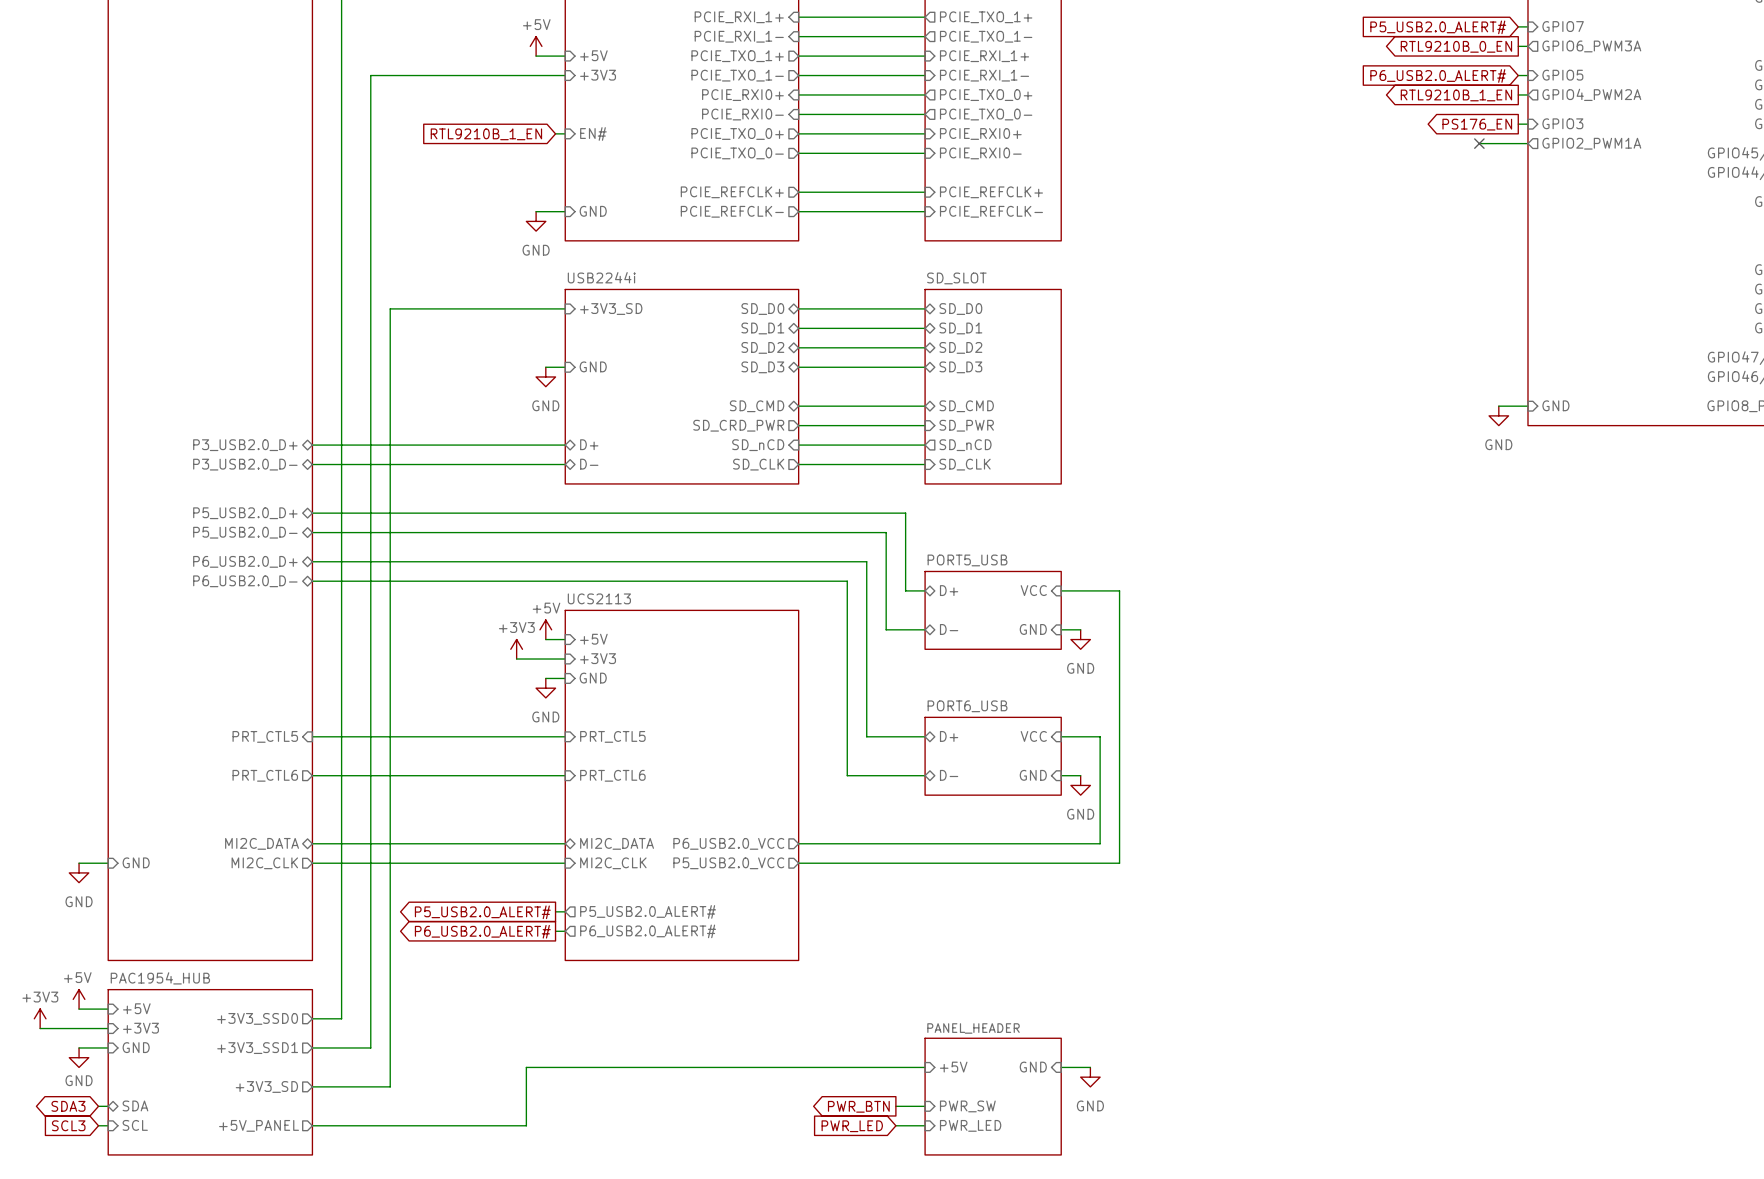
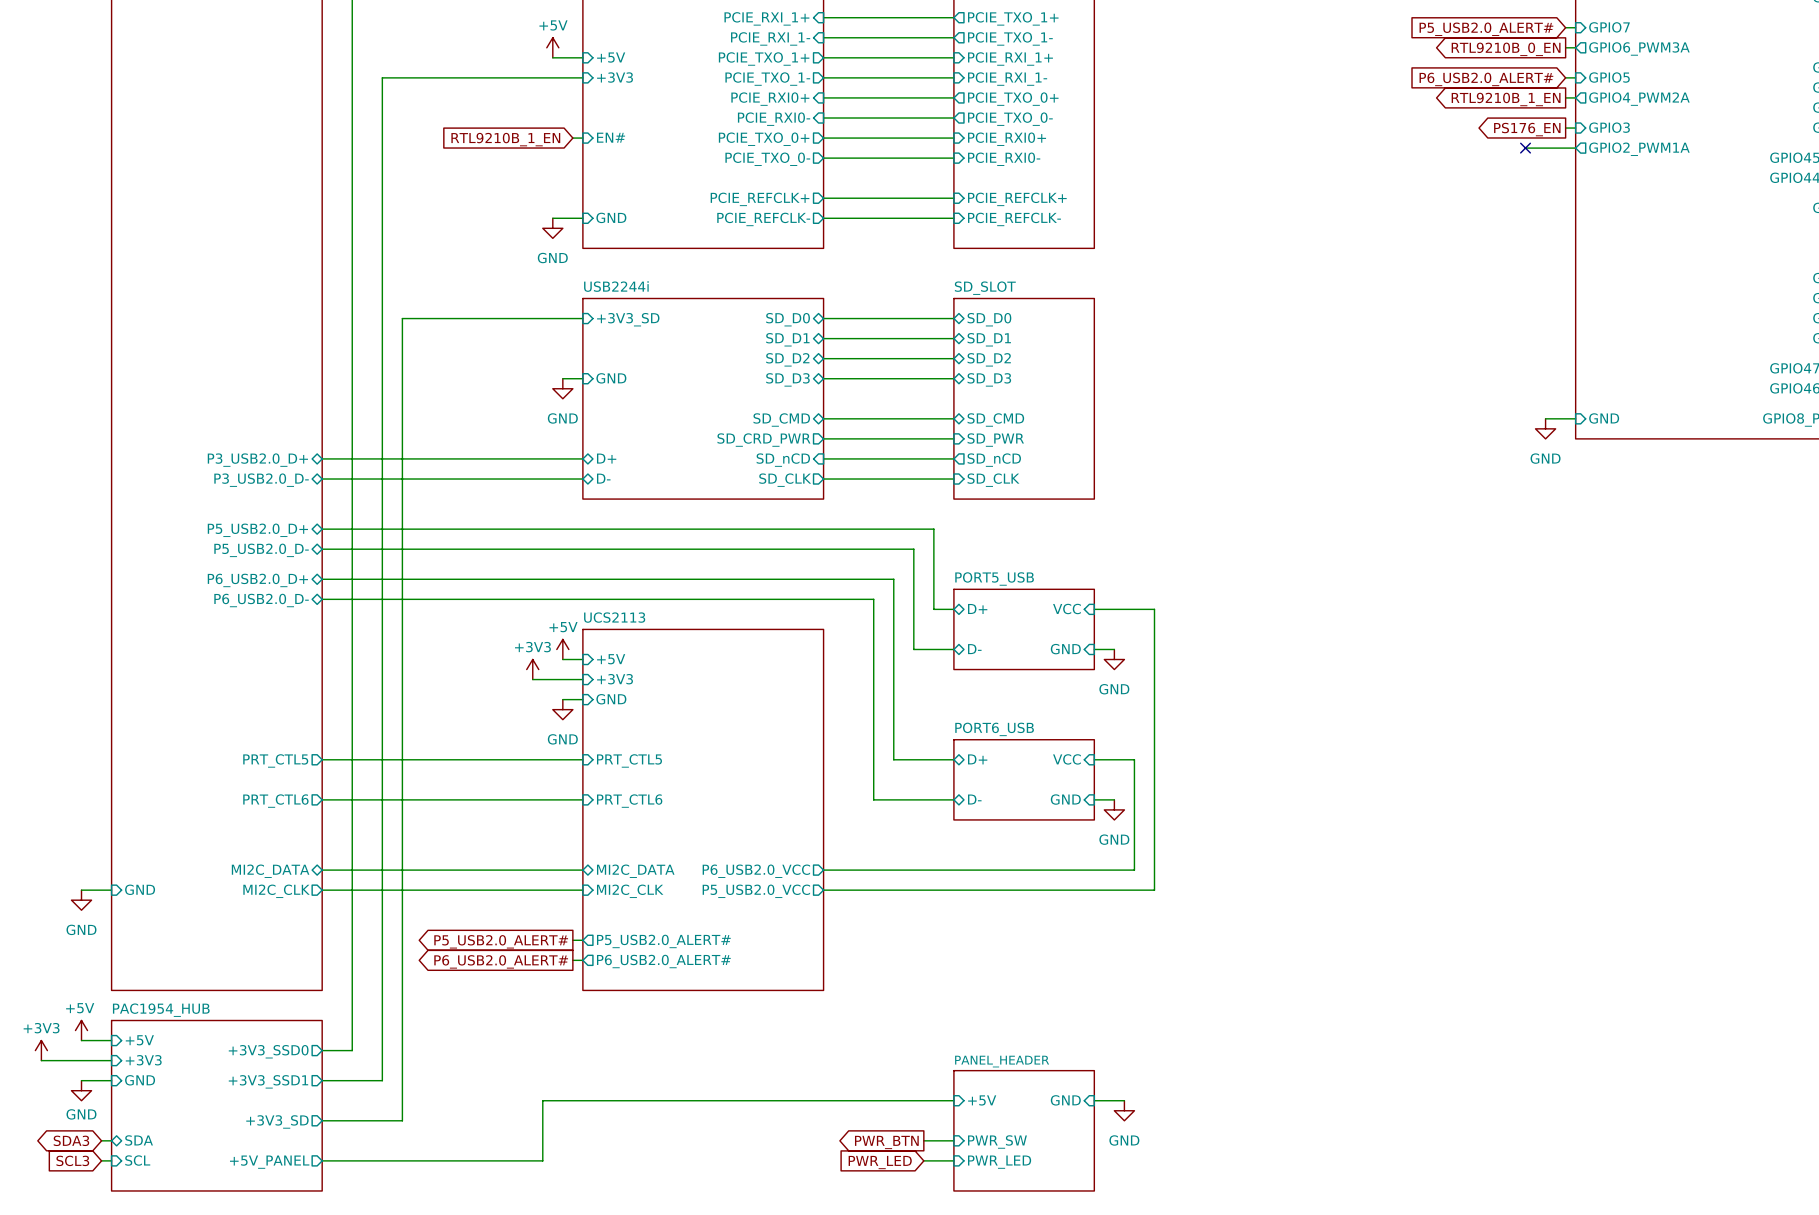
sheet pin shape: input (265, 736) -> output (275, 760)

